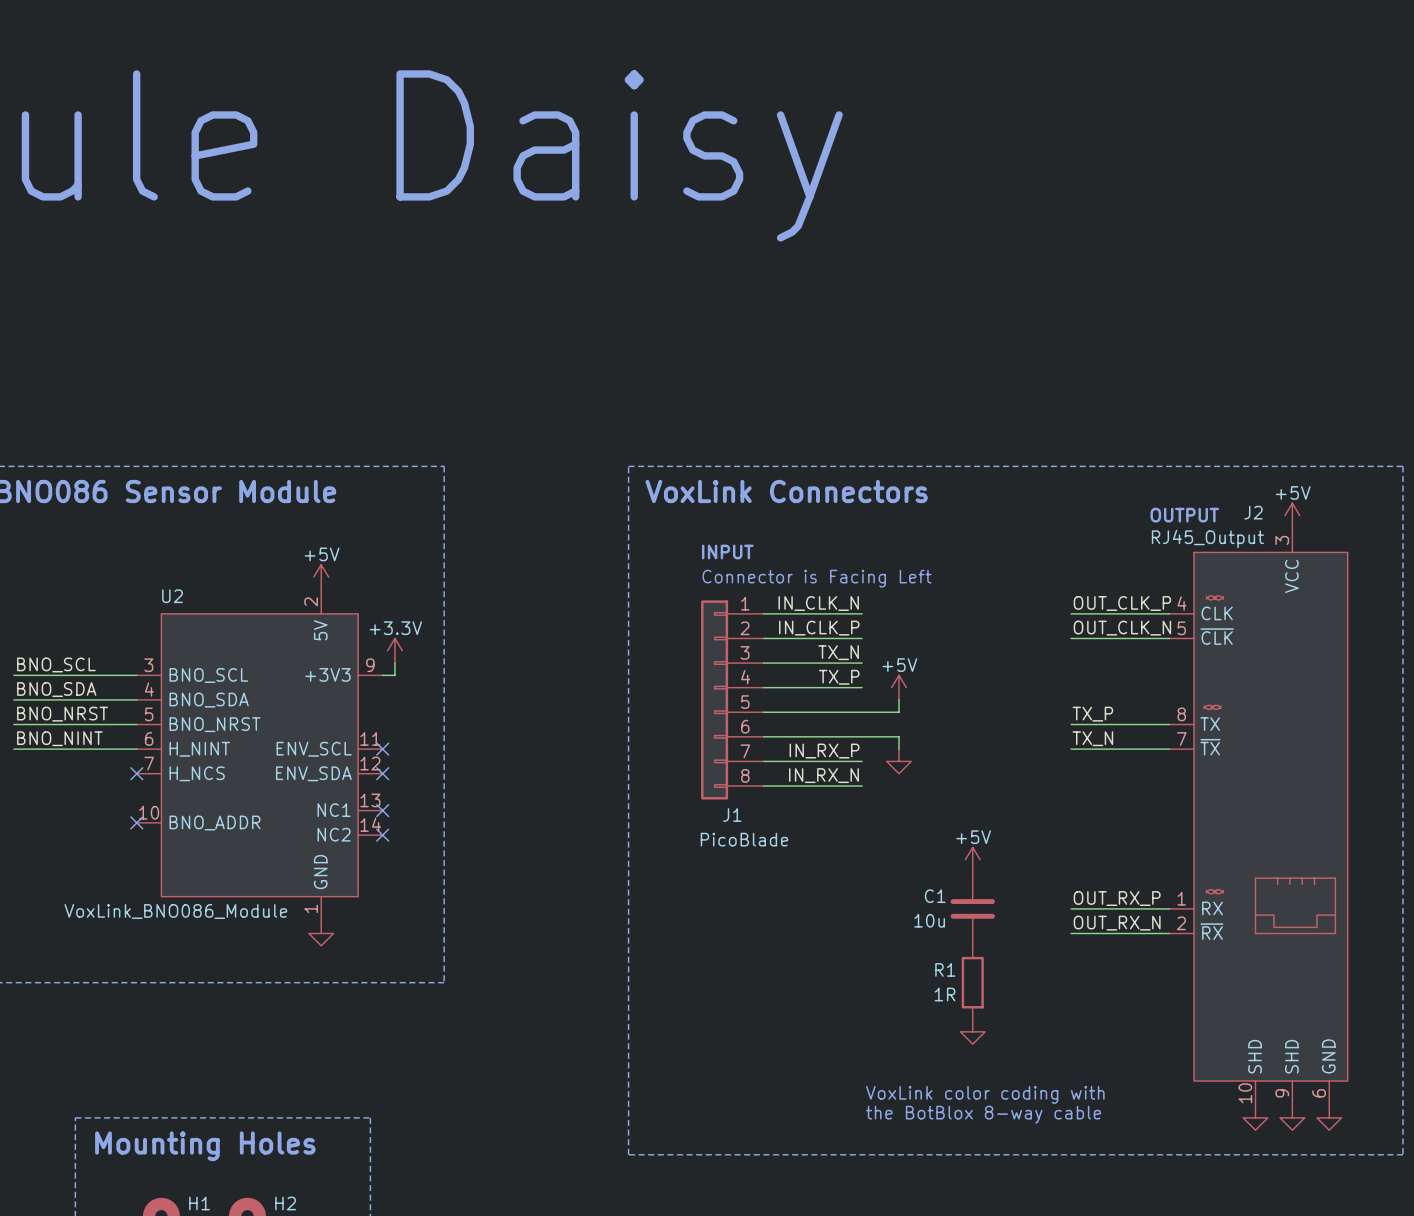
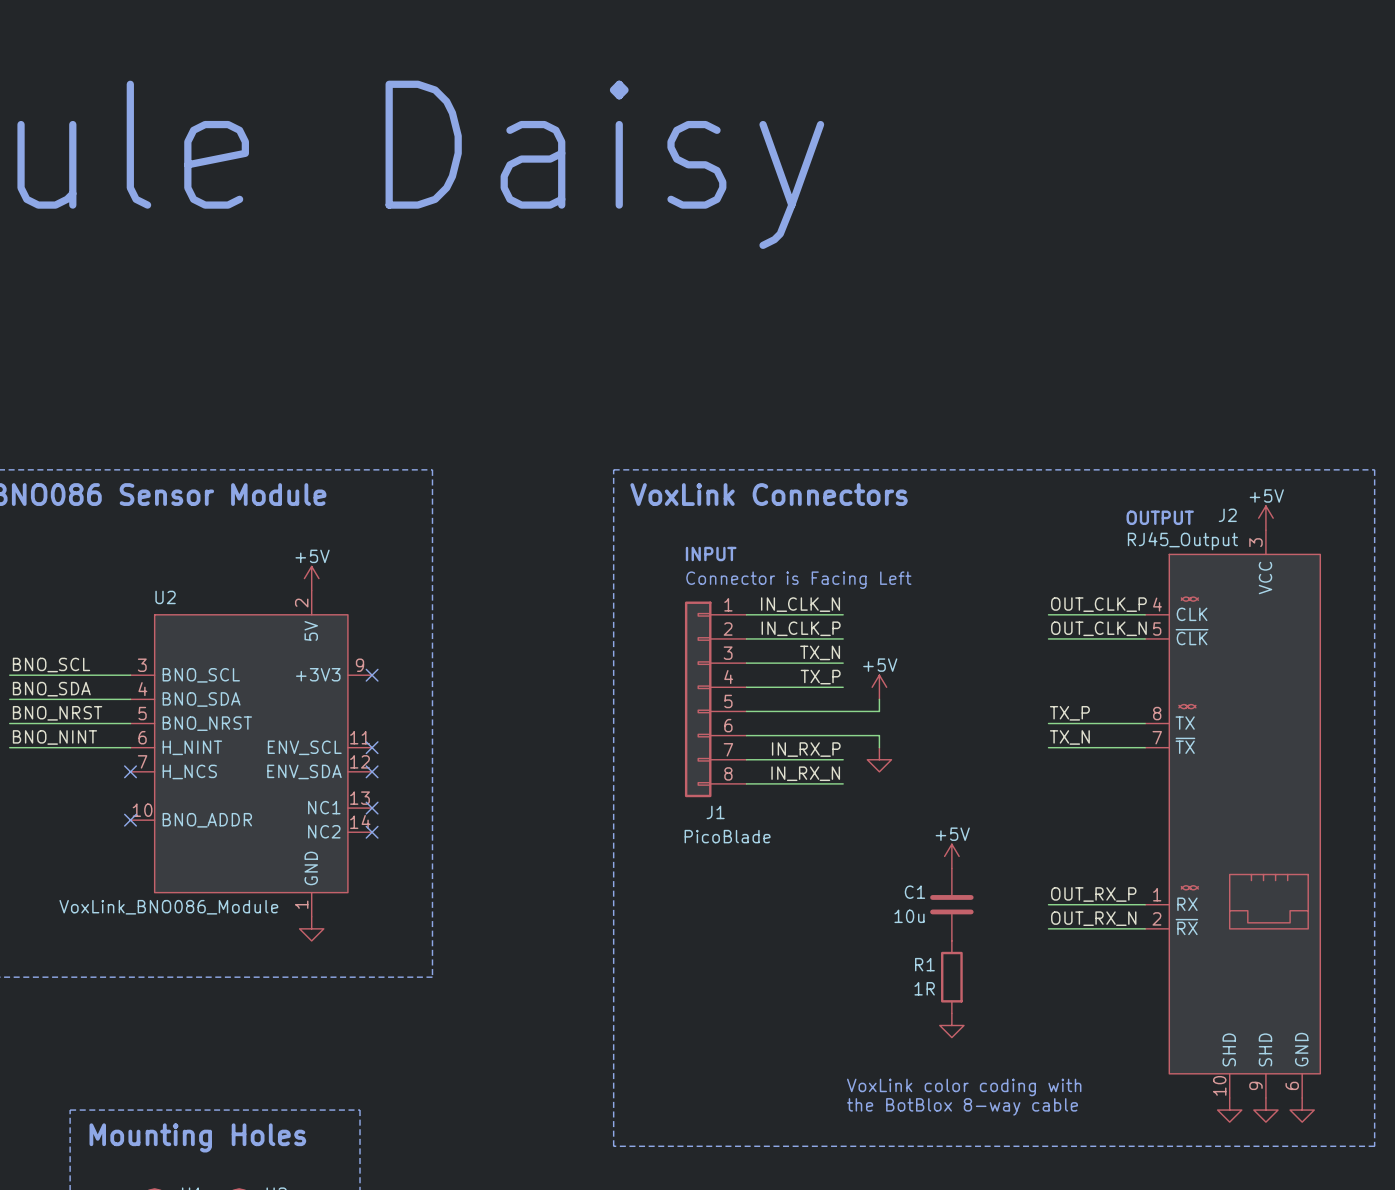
power symbol: +3.3V (394, 650) -> none
wire: (394, 663) (394, 675) (382, 675) -> none
no-connect mark: none -> (372, 675)

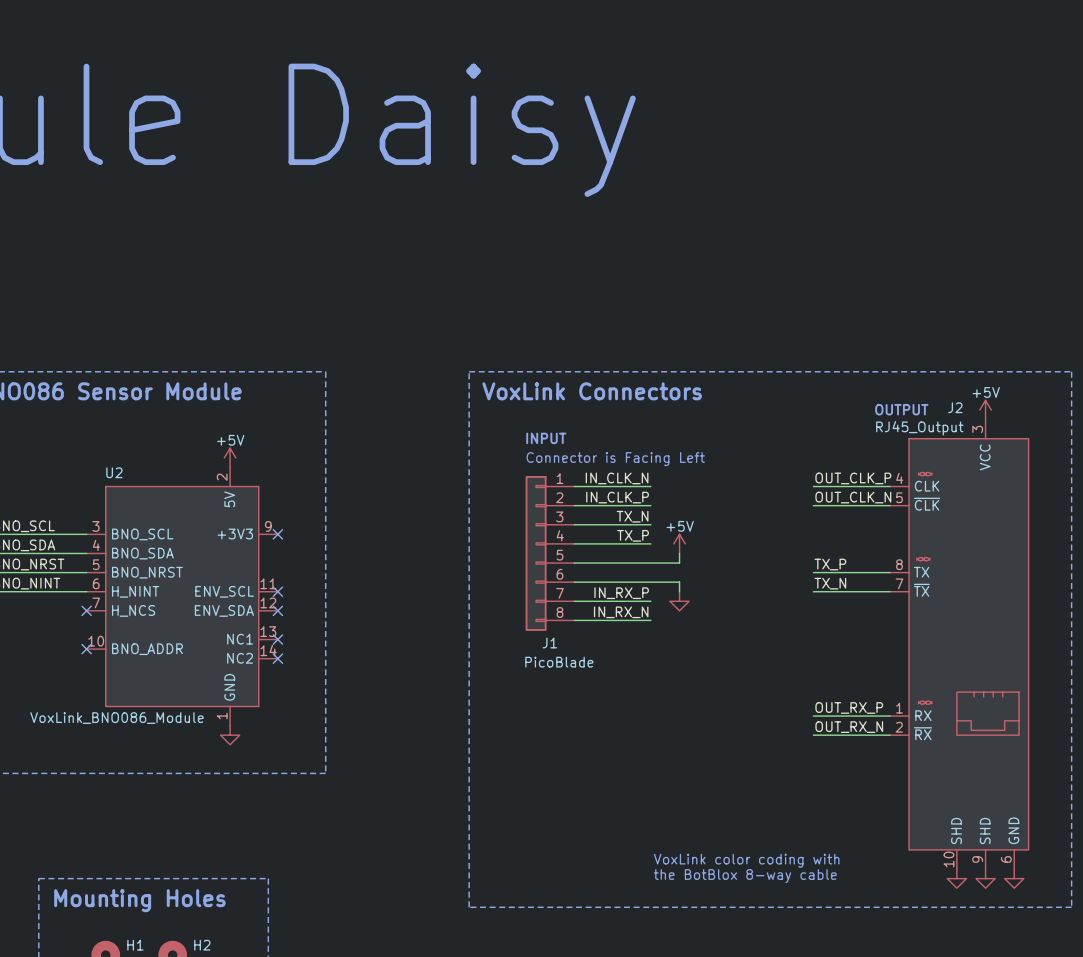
power symbol: +5V (951, 856) -> none
C1: 10u (951, 904) -> none
R1: 1R (951, 977) -> none
power symbol: (951, 1025) -> none

